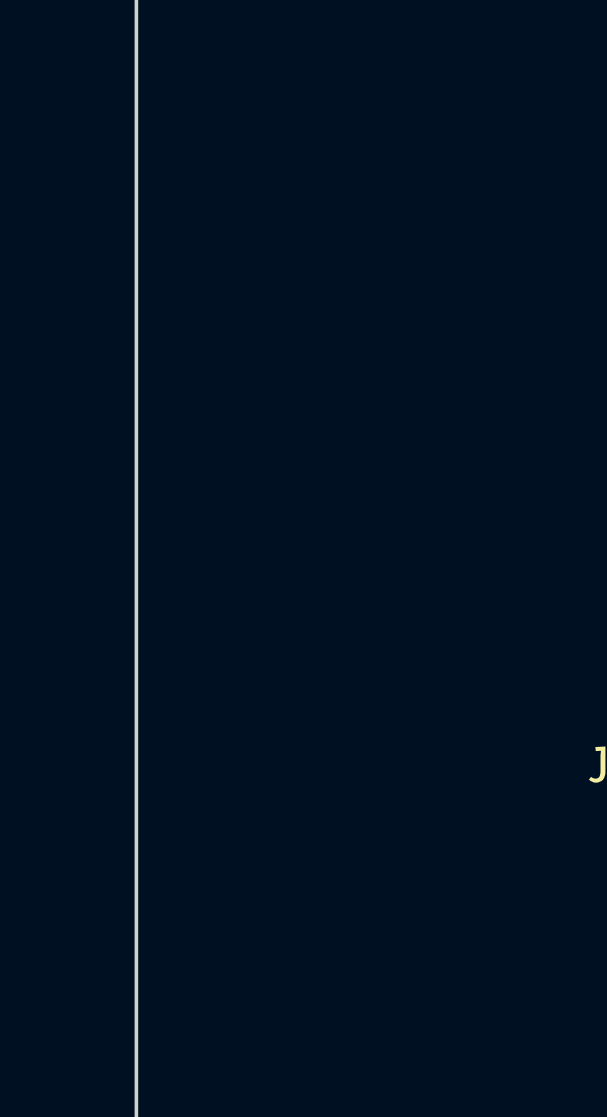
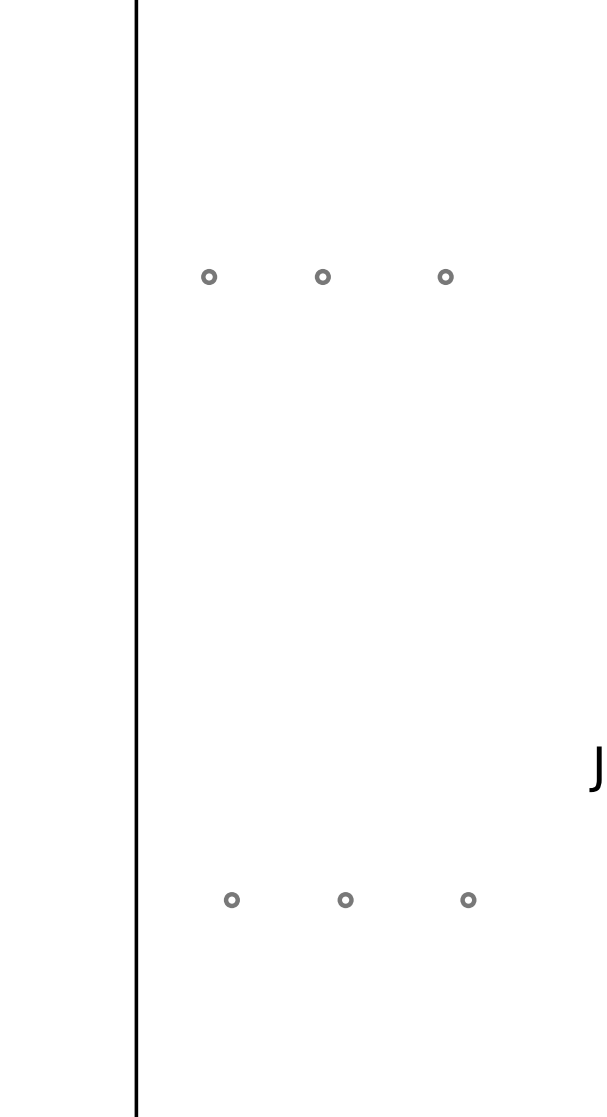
via: none -> (209, 276)
via: none -> (322, 276)
via: none -> (445, 276)
via: none -> (231, 900)
via: none -> (345, 900)
via: none -> (468, 900)

